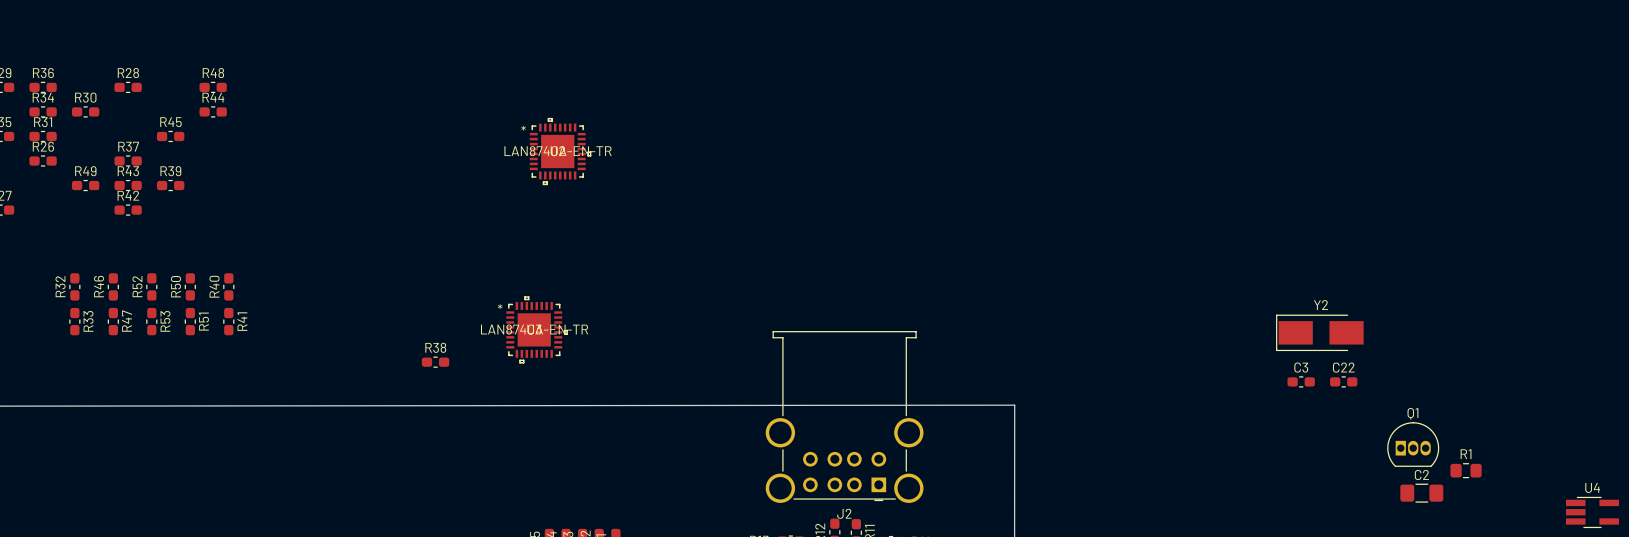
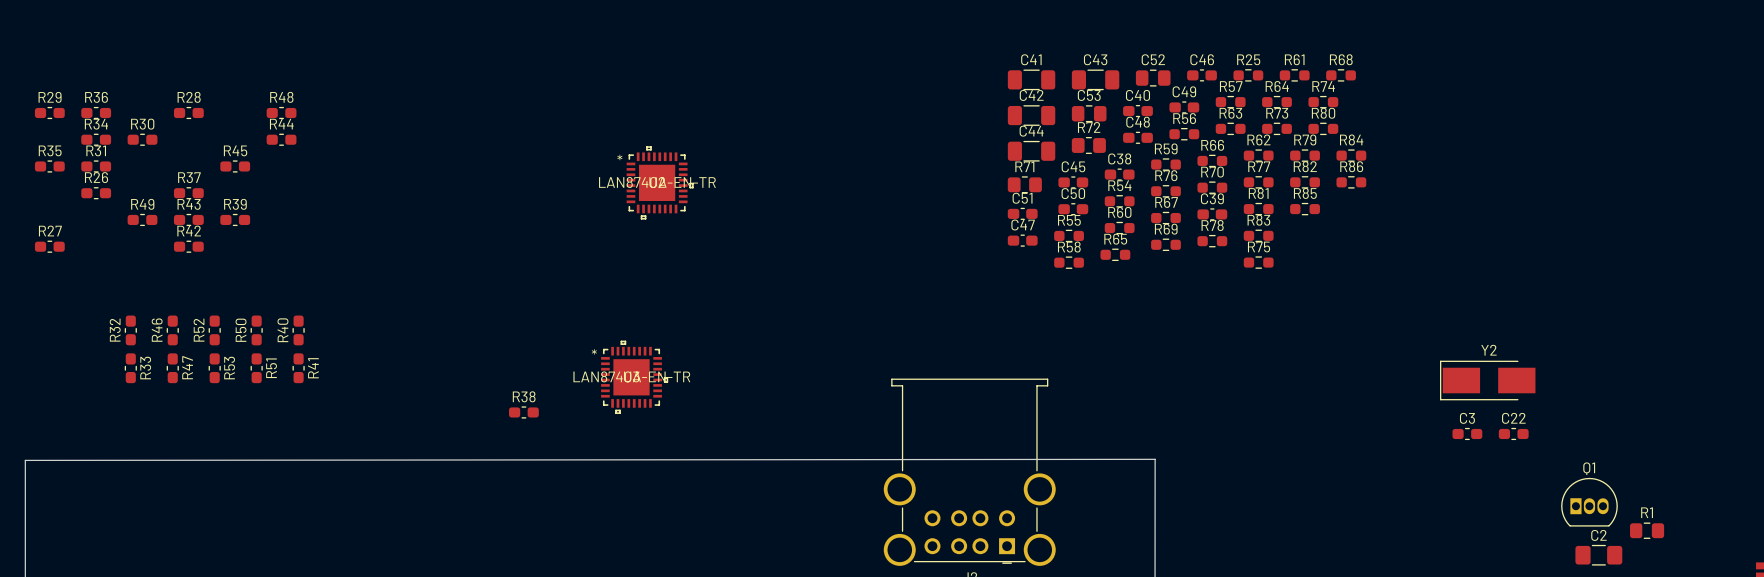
C46: none -> (1202, 75)
R25: none -> (1248, 75)
R61: none -> (1294, 75)
R68: none -> (1341, 75)
C52: none -> (1153, 78)
C41: none -> (1031, 79)
C43: none -> (1095, 79)
R57: none -> (1230, 102)
R64: none -> (1277, 102)
R74: none -> (1323, 102)
C49: none -> (1184, 107)
C40: none -> (1137, 111)
C53: none -> (1089, 113)
C42: none -> (1031, 115)
R63: none -> (1230, 128)
R73: none -> (1277, 128)
R80: none -> (1323, 128)
R56: none -> (1184, 134)
C48: none -> (1137, 137)
R72: none -> (1088, 145)
C44: none -> (1031, 151)
R62: none -> (1258, 155)
R79: none -> (1305, 155)
R84: none -> (1351, 155)
R66: none -> (1212, 160)
R59: none -> (1166, 164)
C38: none -> (1119, 174)
C45: none -> (1073, 182)
R77: none -> (1258, 182)
R82: none -> (1305, 182)
R86: none -> (1351, 182)
R71: none -> (1024, 184)
R70: none -> (1212, 187)
R76: none -> (1166, 191)
R54: none -> (1119, 201)
C50: none -> (1073, 209)
R81: none -> (1258, 209)
R85: none -> (1305, 209)
C51: none -> (1022, 213)
C39: none -> (1212, 214)
R67: none -> (1166, 218)
R60: none -> (1119, 228)
R55: none -> (1069, 235)
R83: none -> (1258, 235)
C47: none -> (1022, 240)
R78: none -> (1212, 241)
R69: none -> (1166, 244)
R65: none -> (1115, 254)
R58: none -> (1069, 262)
R75: none -> (1258, 262)

